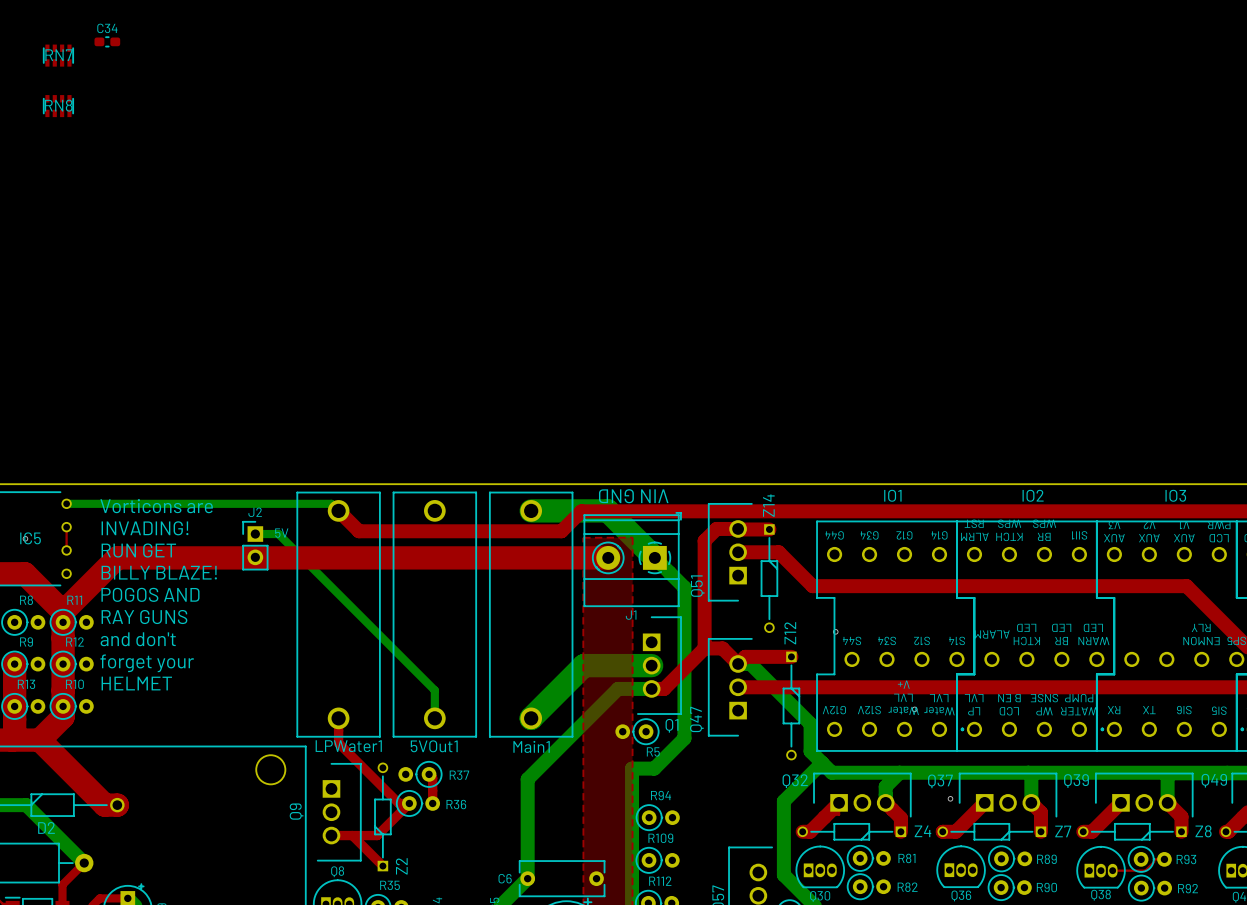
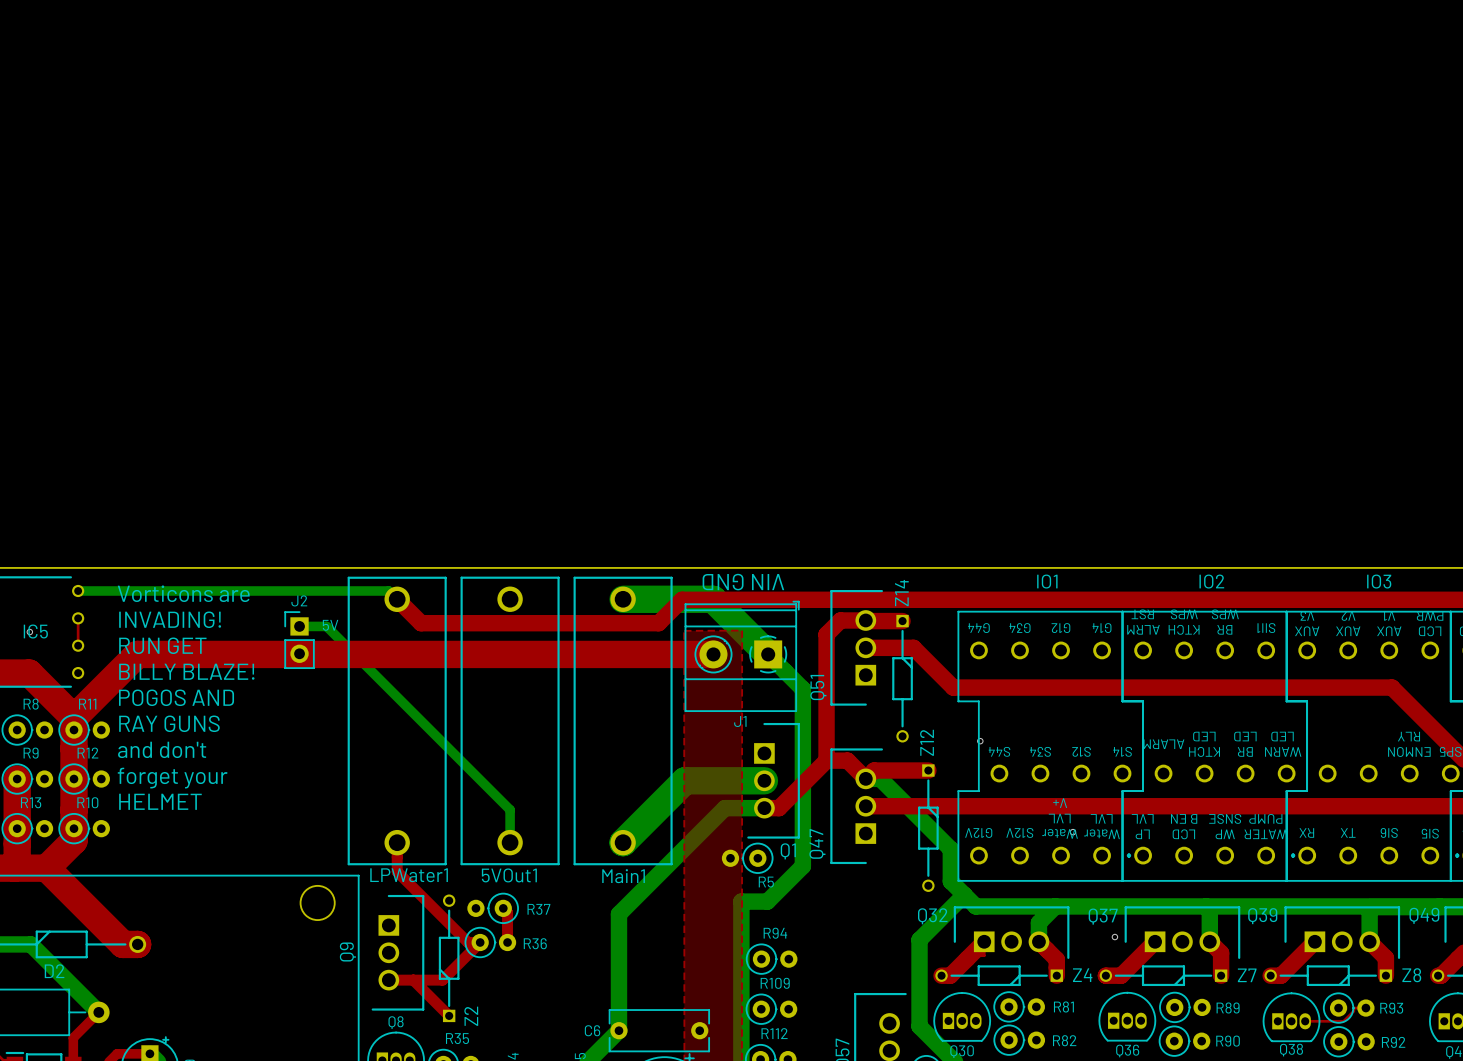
C34: (107, 41) -> none
RN7: (58, 55) -> none
RN8: (58, 106) -> none

